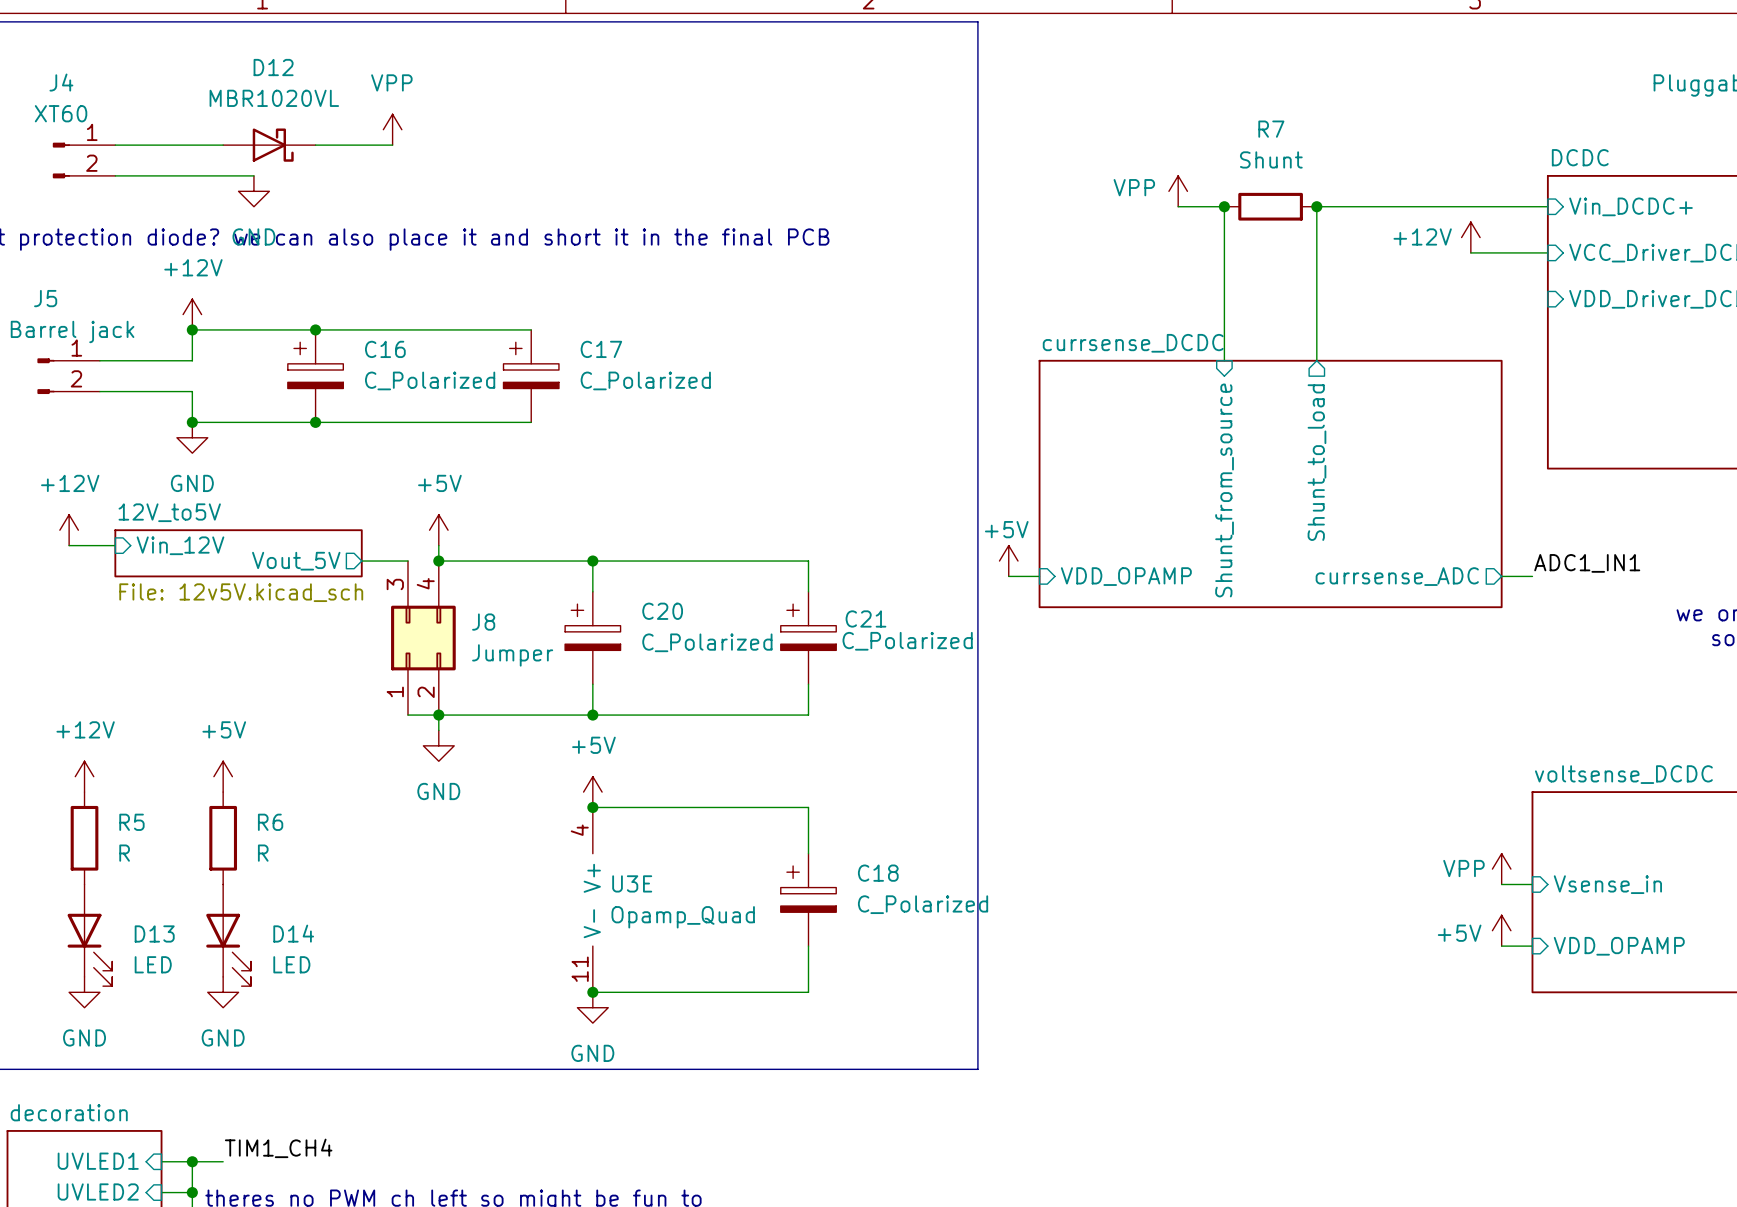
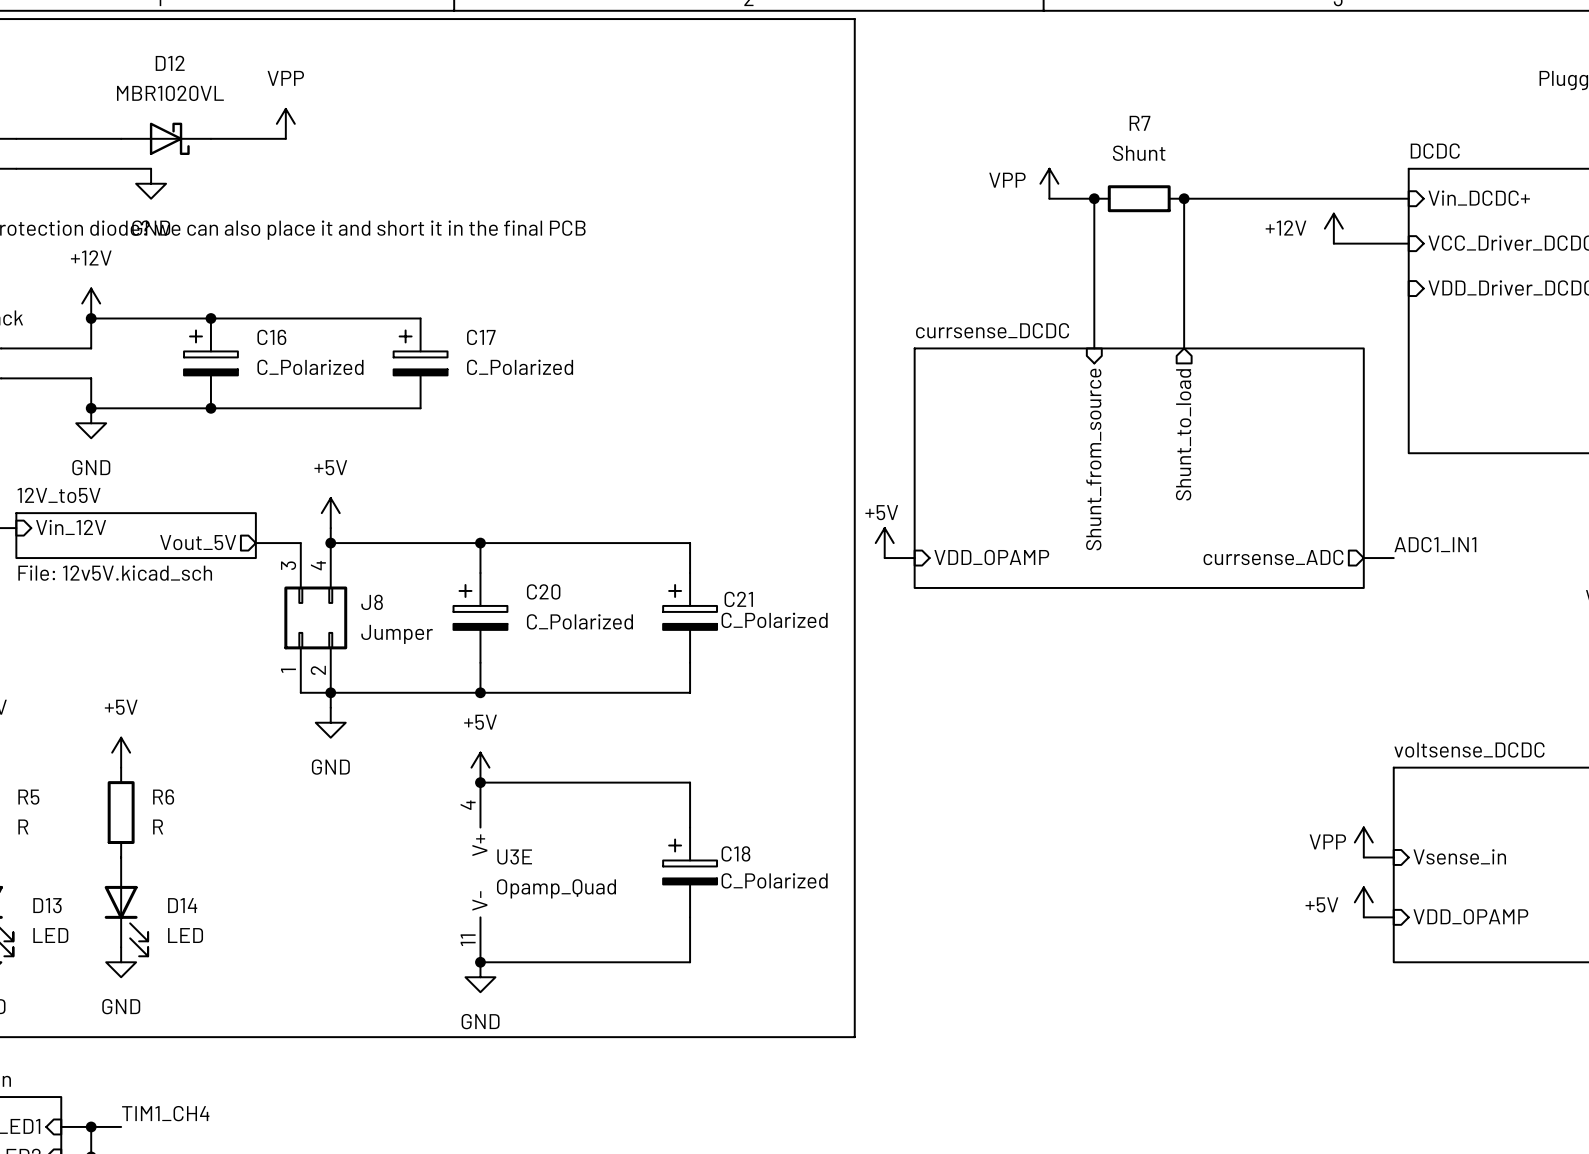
C18 name position: C18 (878, 873) -> C18 (735, 853)
C18 value position: C_Polarized (923, 904) -> C_Polarized (774, 880)

